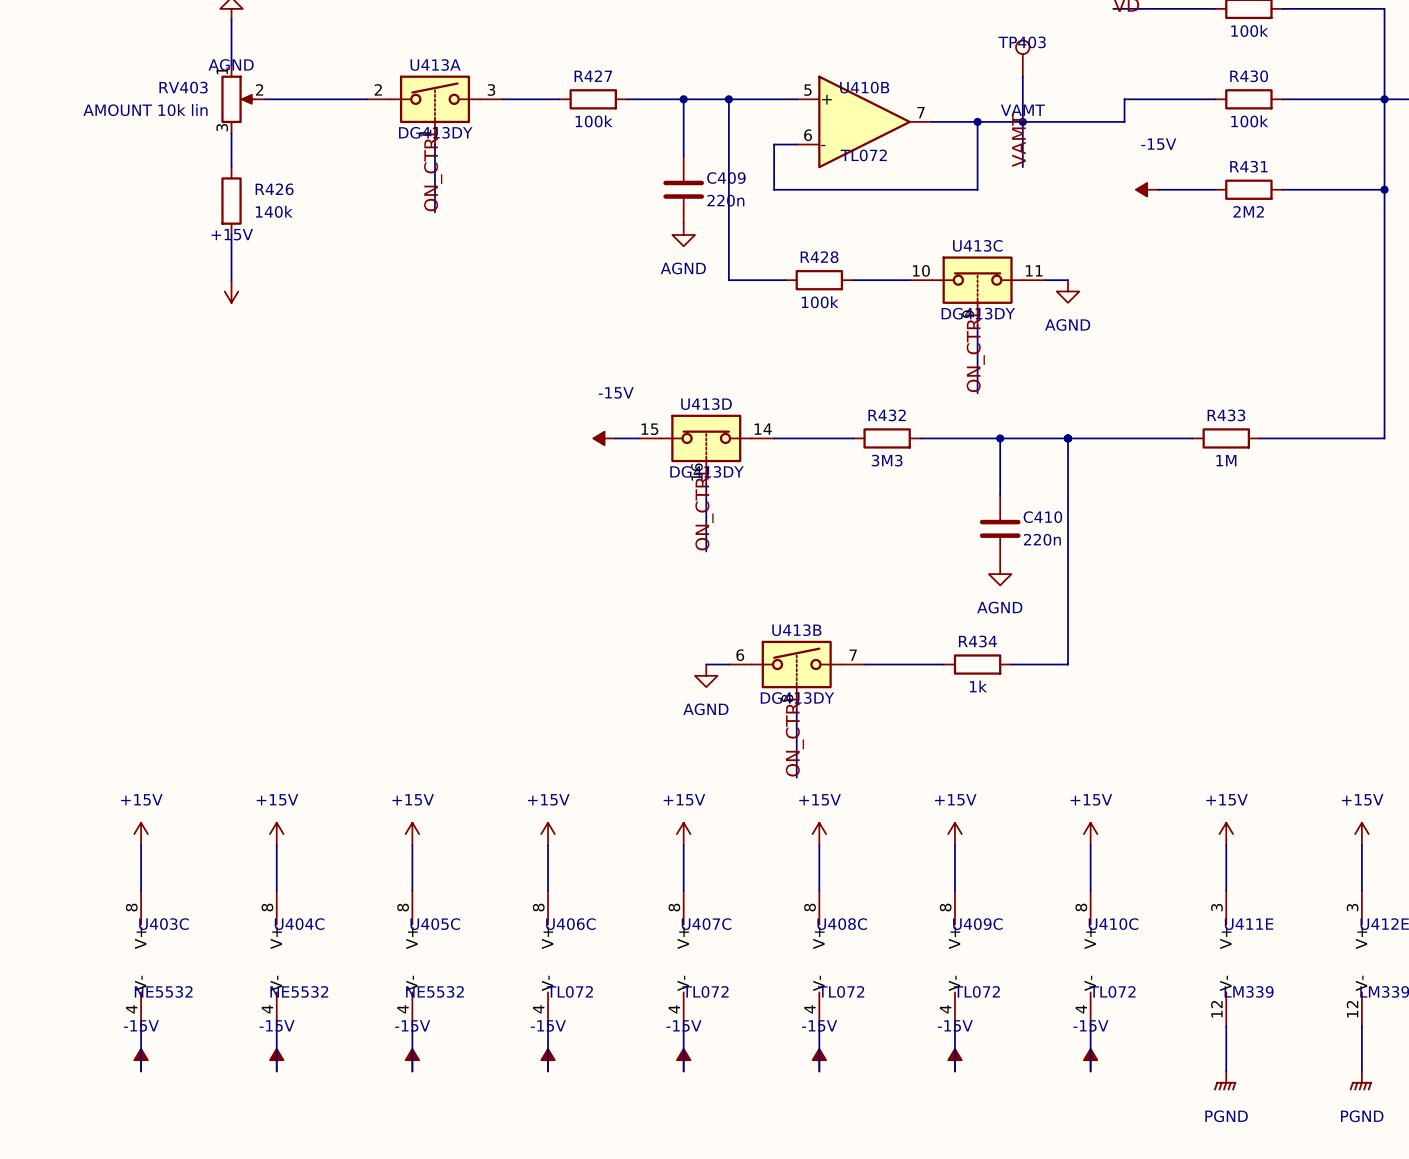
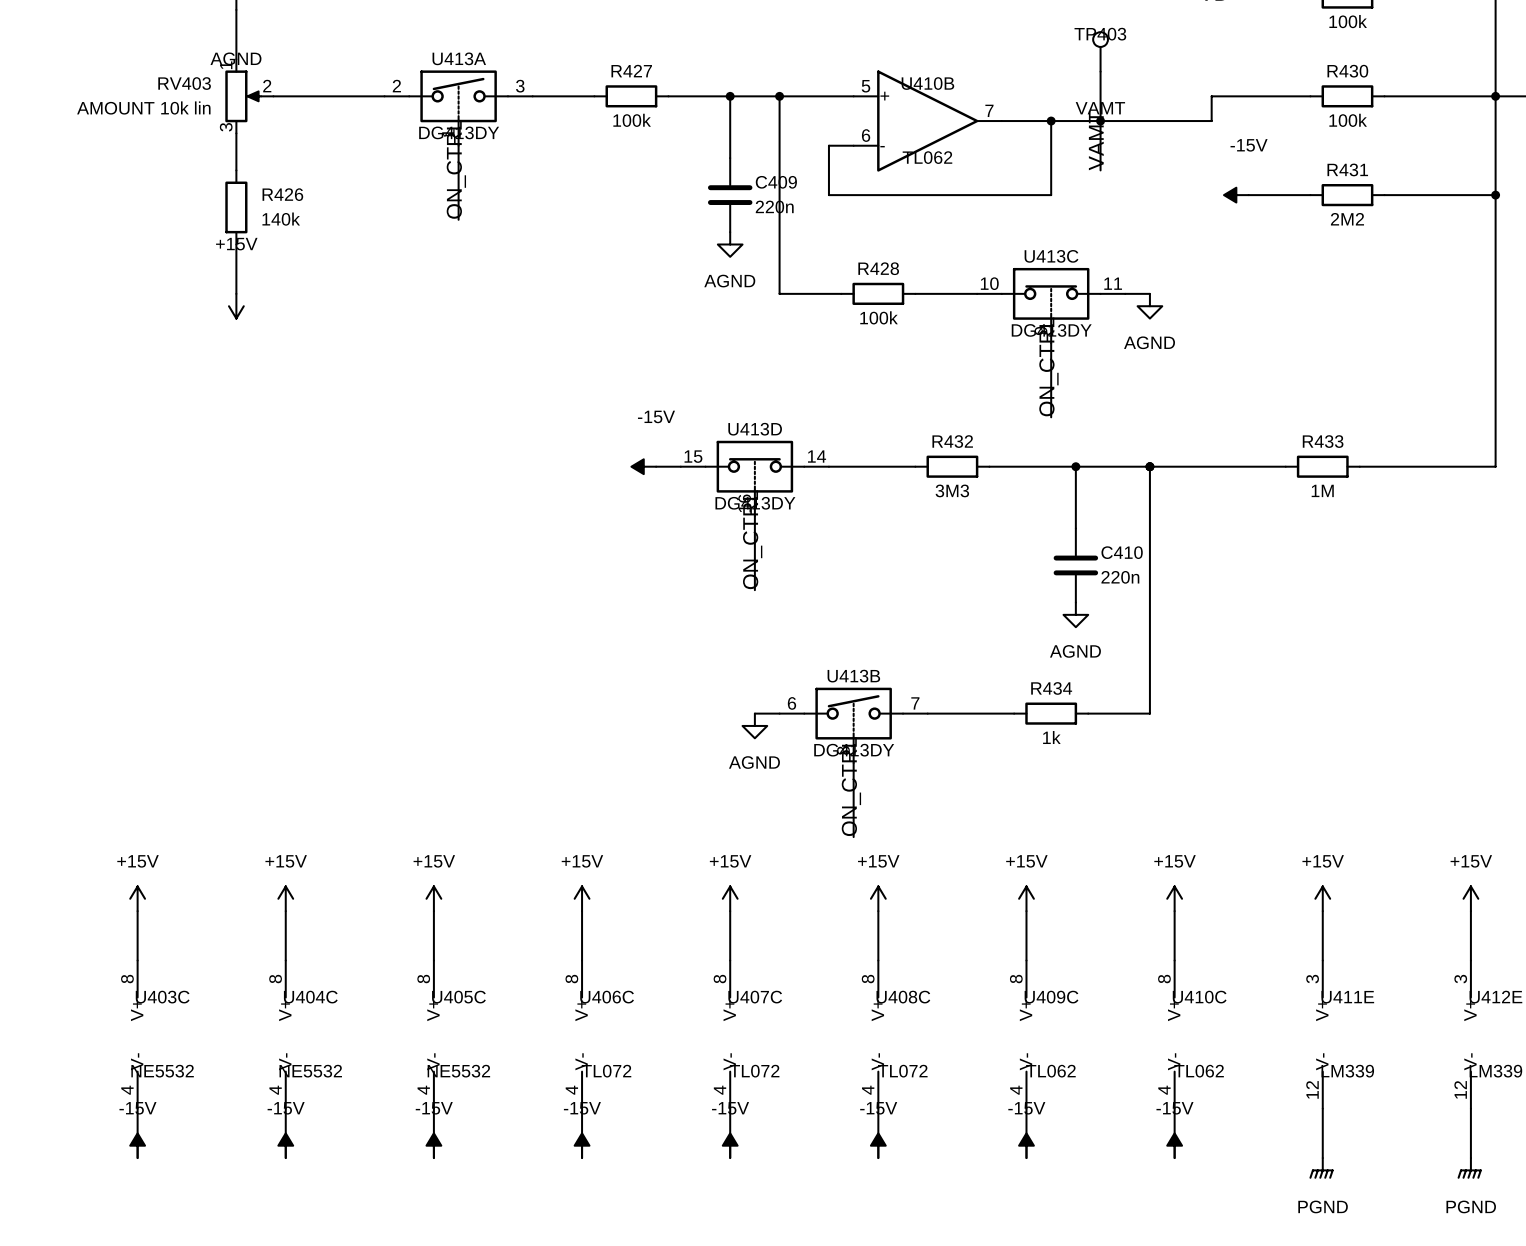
U410B value: TL072 (863, 155) -> TL062 (927, 157)
U409C value: TL072 (976, 991) -> TL062 (1050, 1071)
U410C value: TL072 (1112, 991) -> TL062 (1199, 1071)

